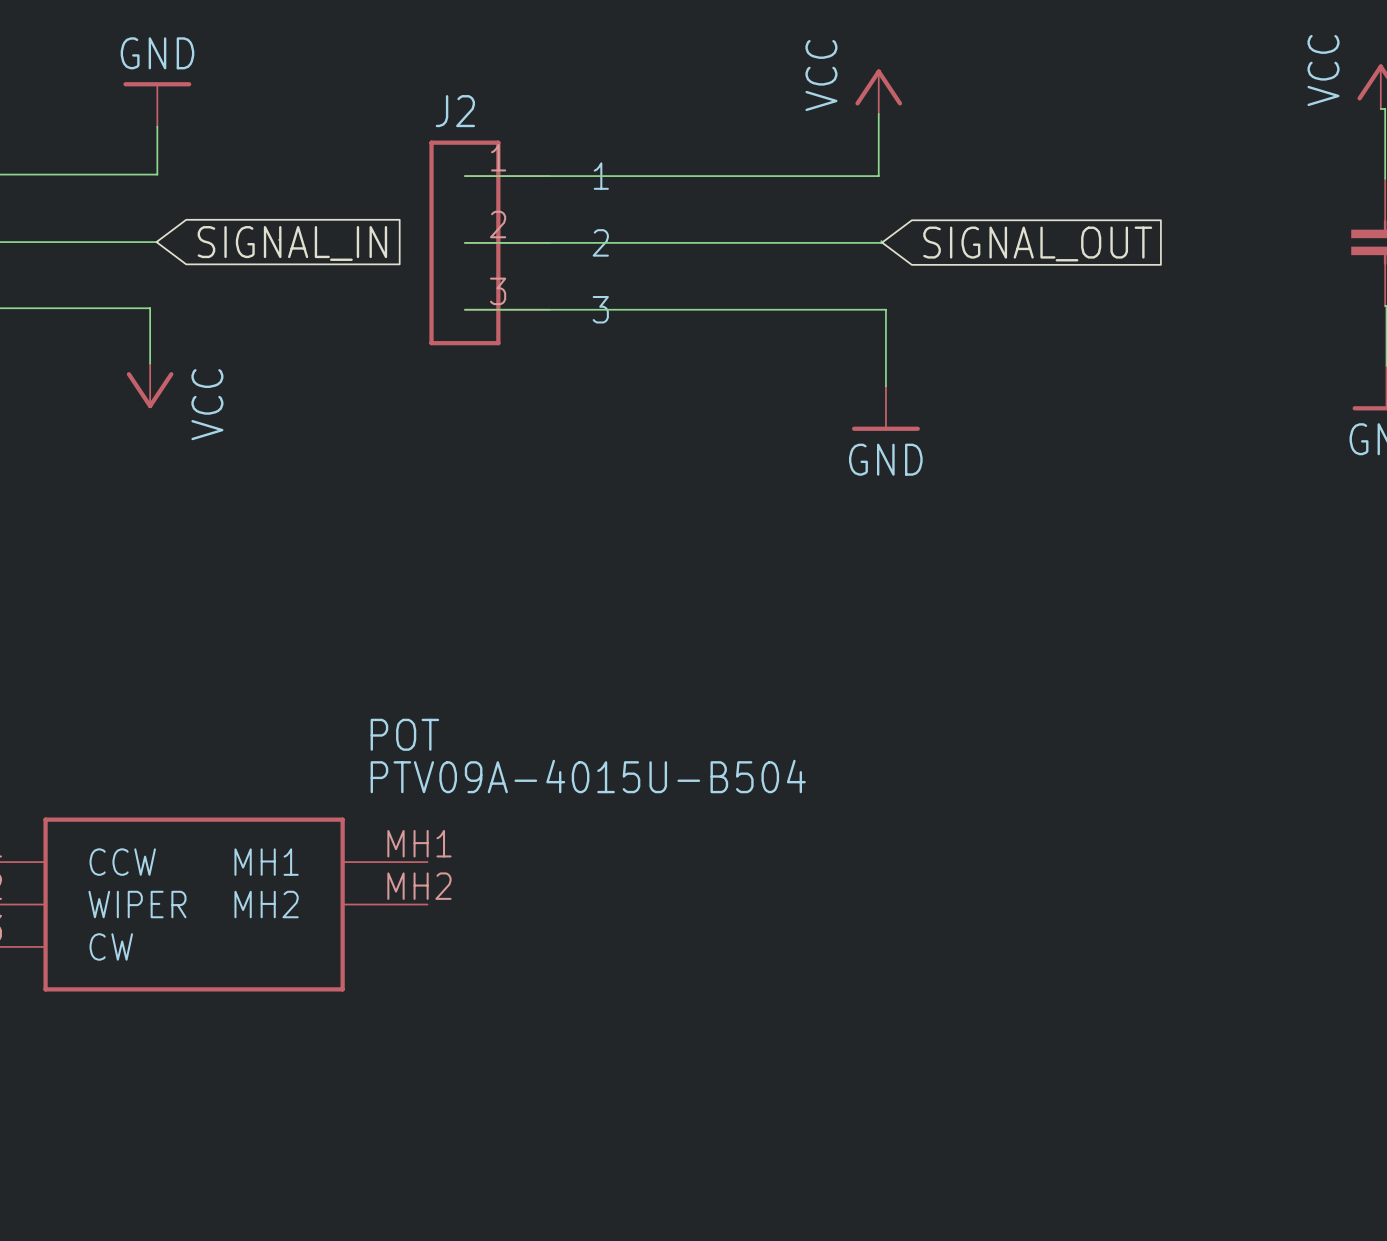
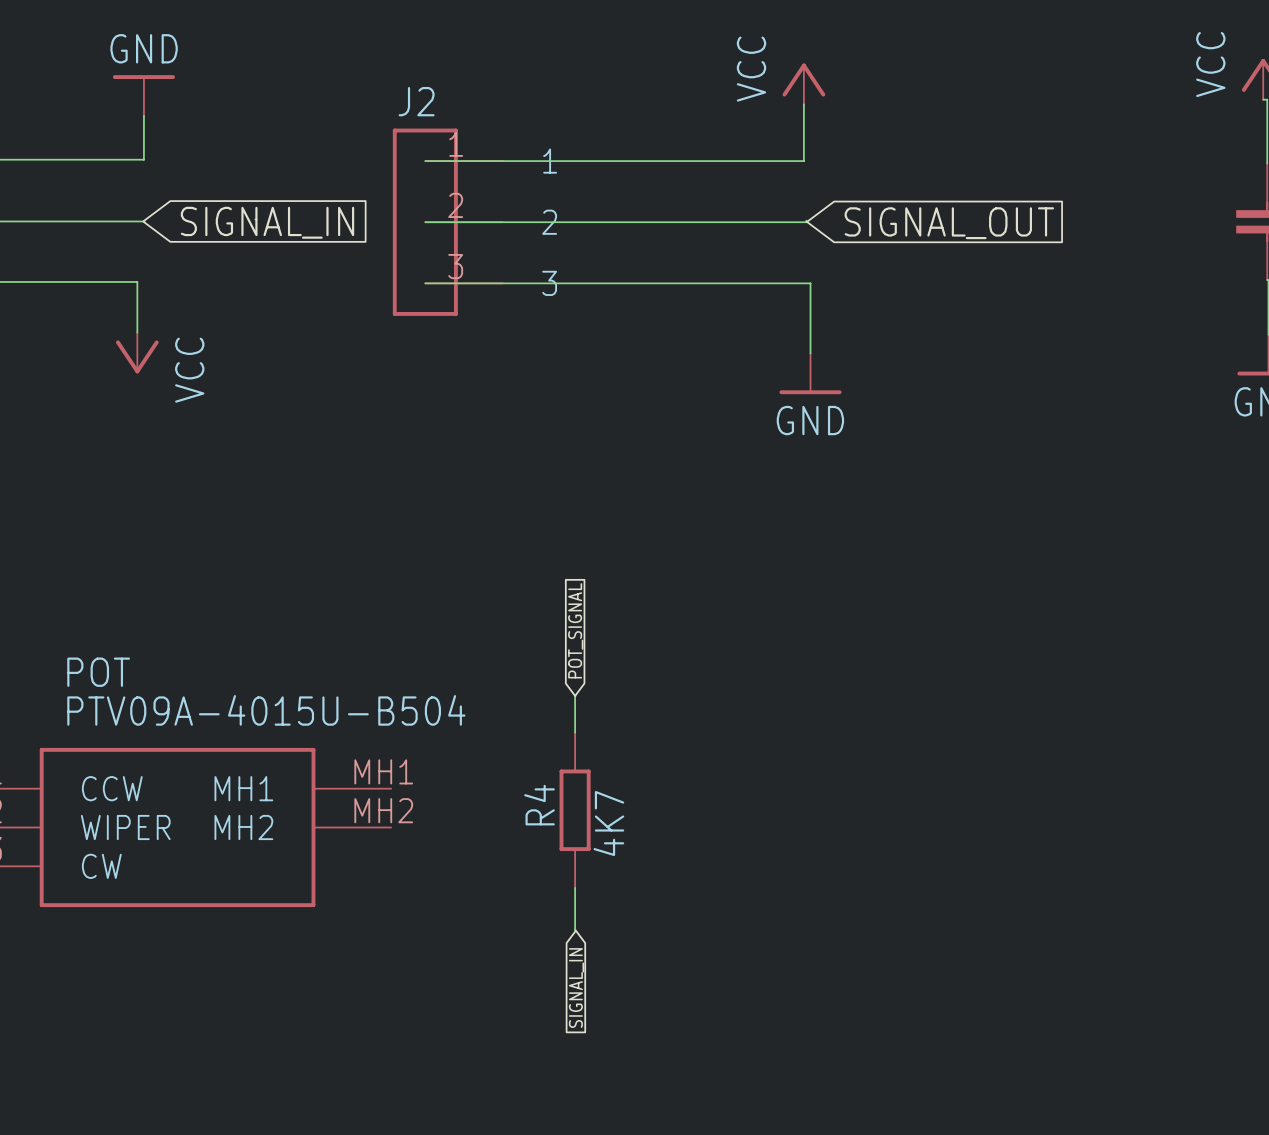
global label: none -> POT_SIGNAL (575, 630)
POT name position: POT (404, 734) -> POT (98, 672)
wire: none -> (575, 695) (575, 732)
POT value position: PTV09A-4015U-B504 (588, 776) -> PTV09A-4015U-B504 (266, 710)
R4: none -> 4K7 (575, 810)
wire: none -> (575, 887) (575, 929)
global label: none -> SIGNAL_IN (576, 988)

